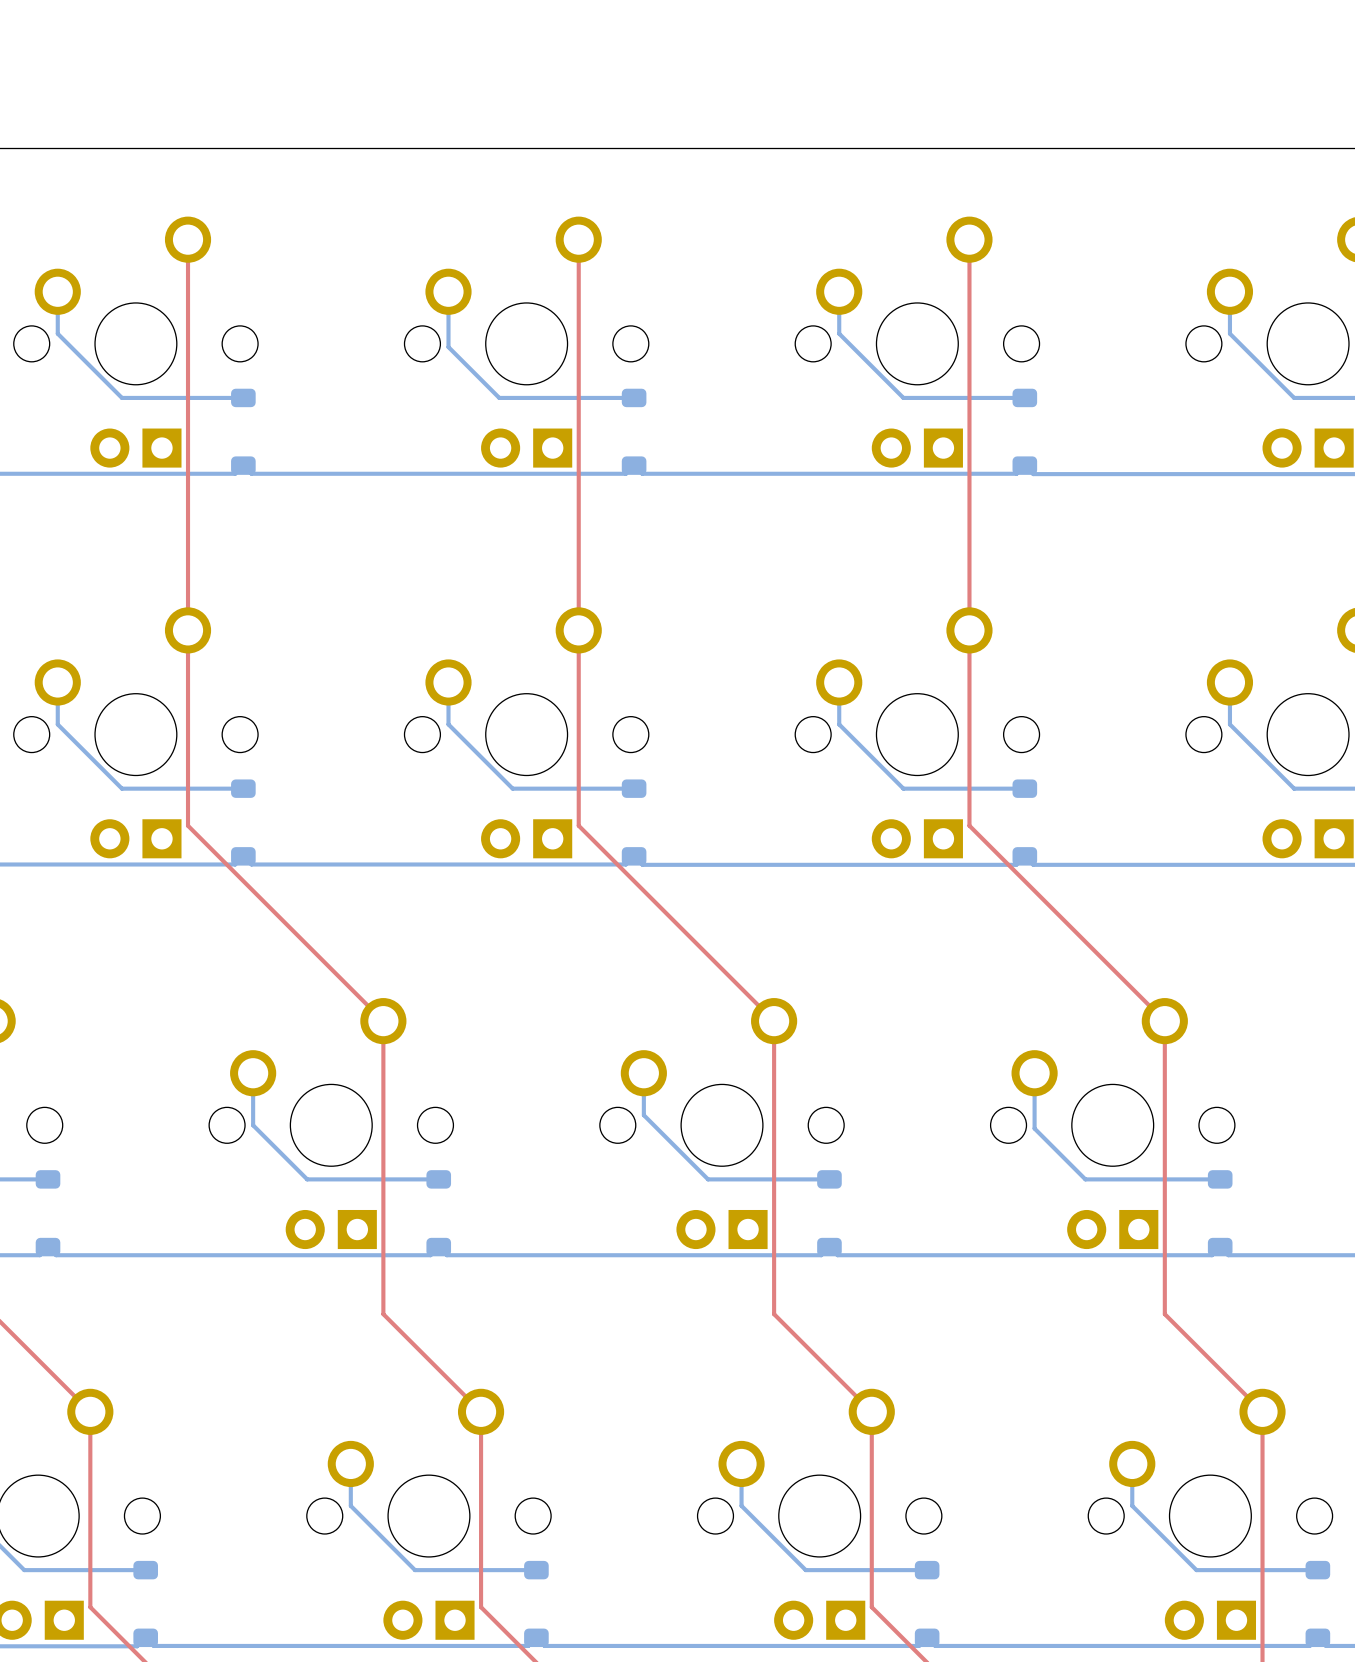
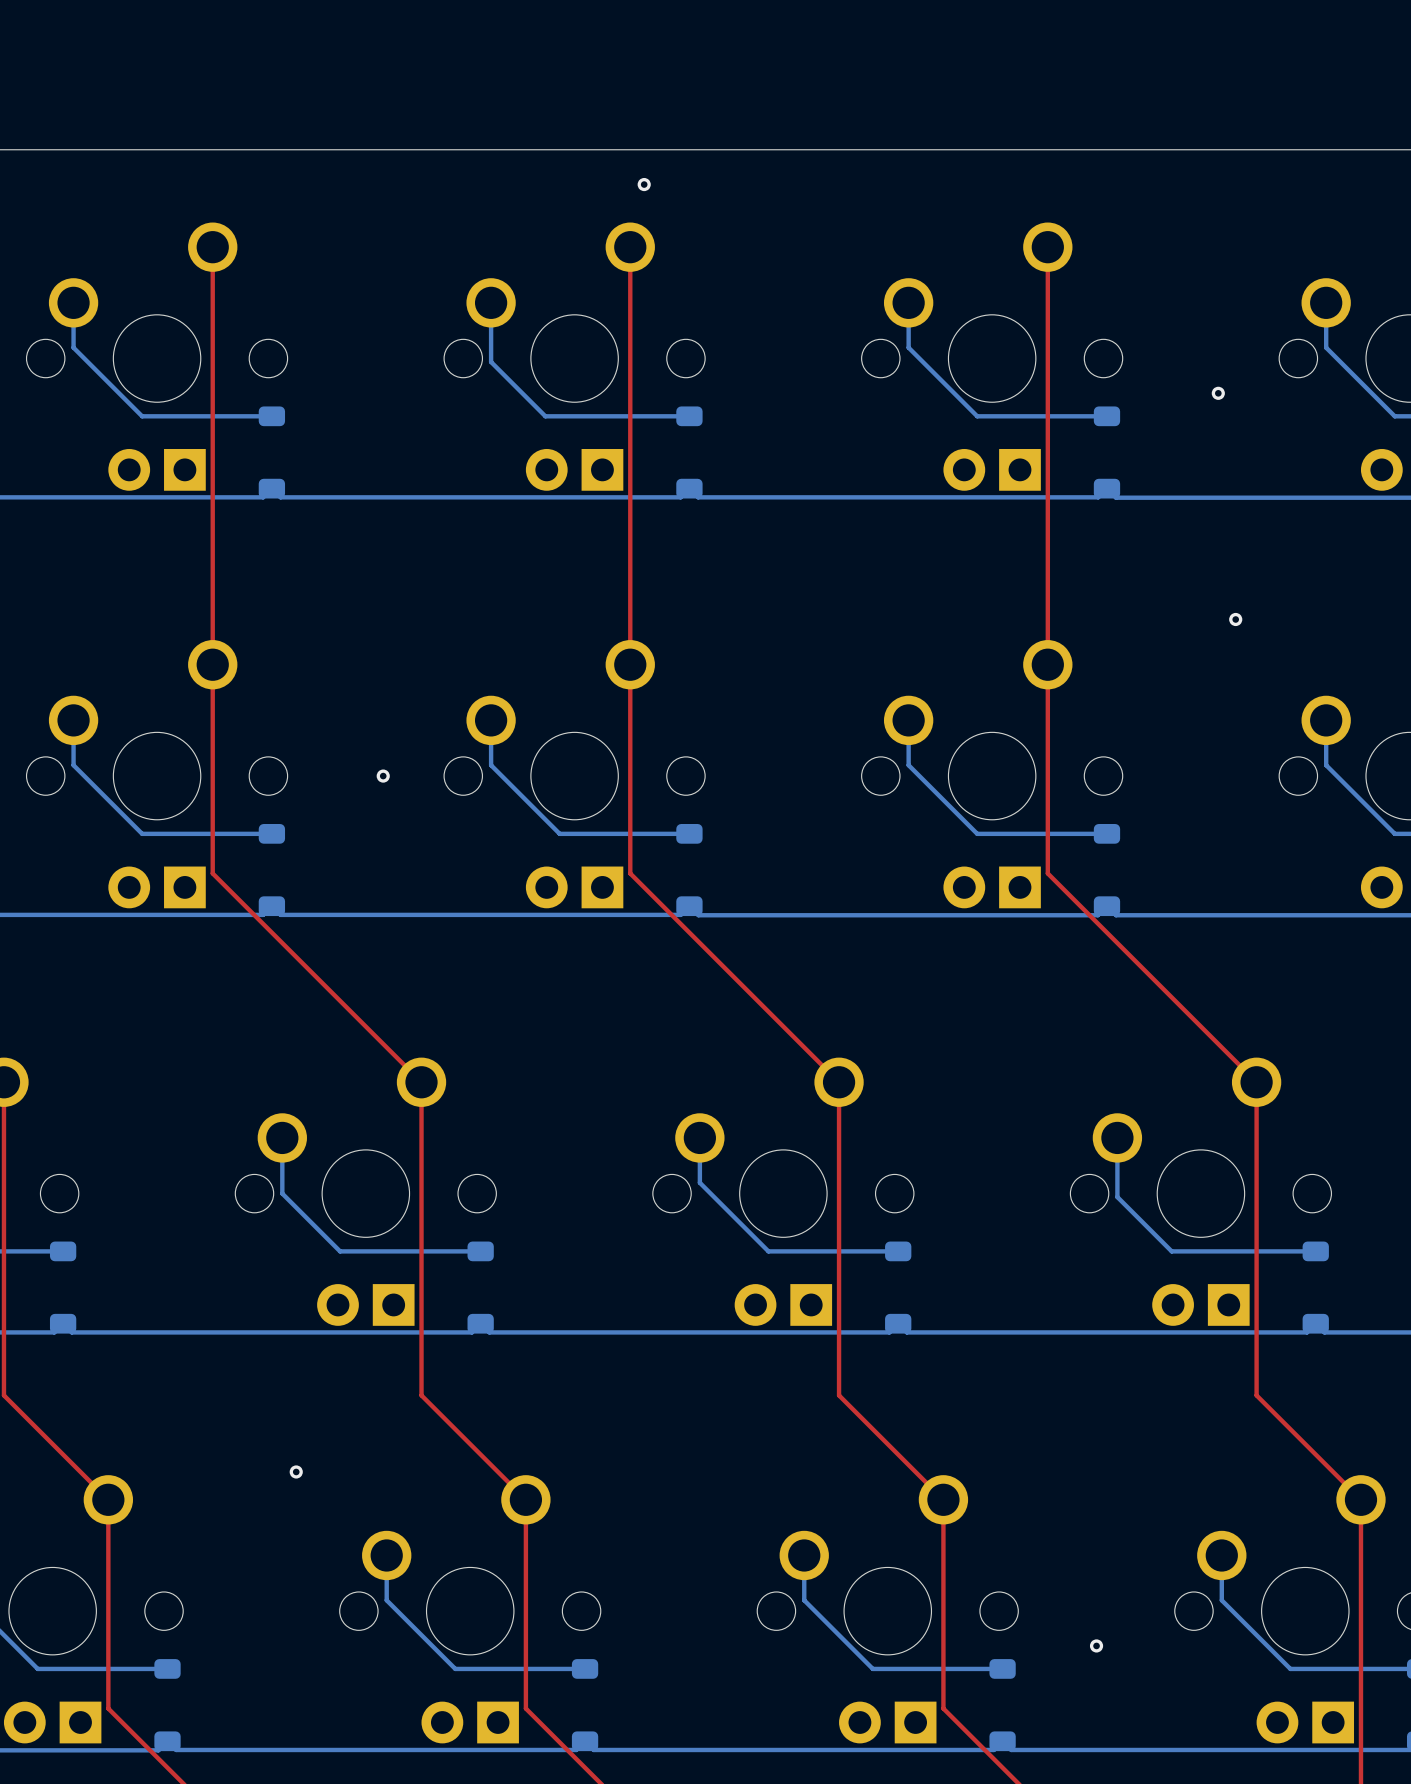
via: none -> (644, 184)
via: none -> (1218, 393)
via: none -> (1235, 619)
via: none -> (383, 776)
via: none -> (296, 1471)
via: none -> (1096, 1645)

